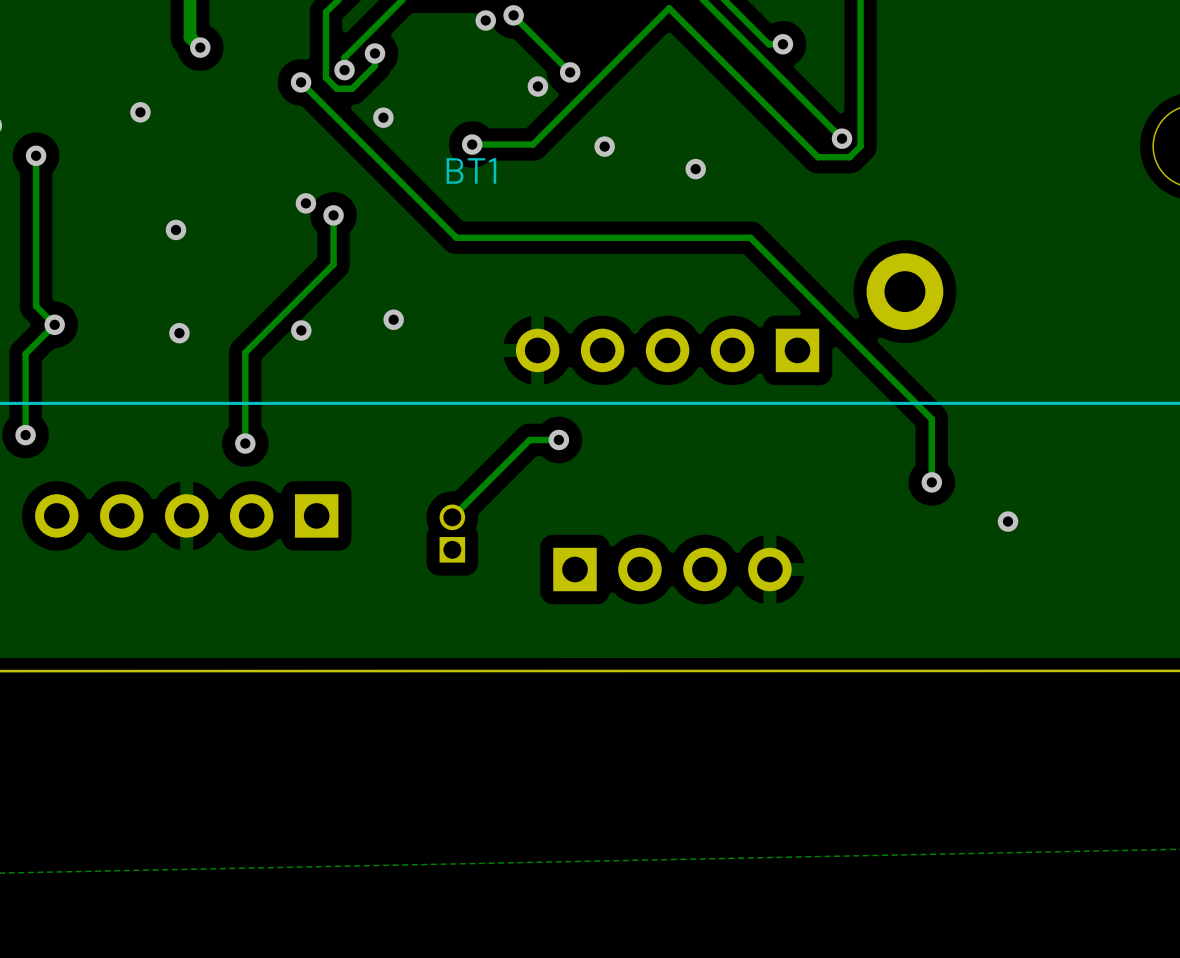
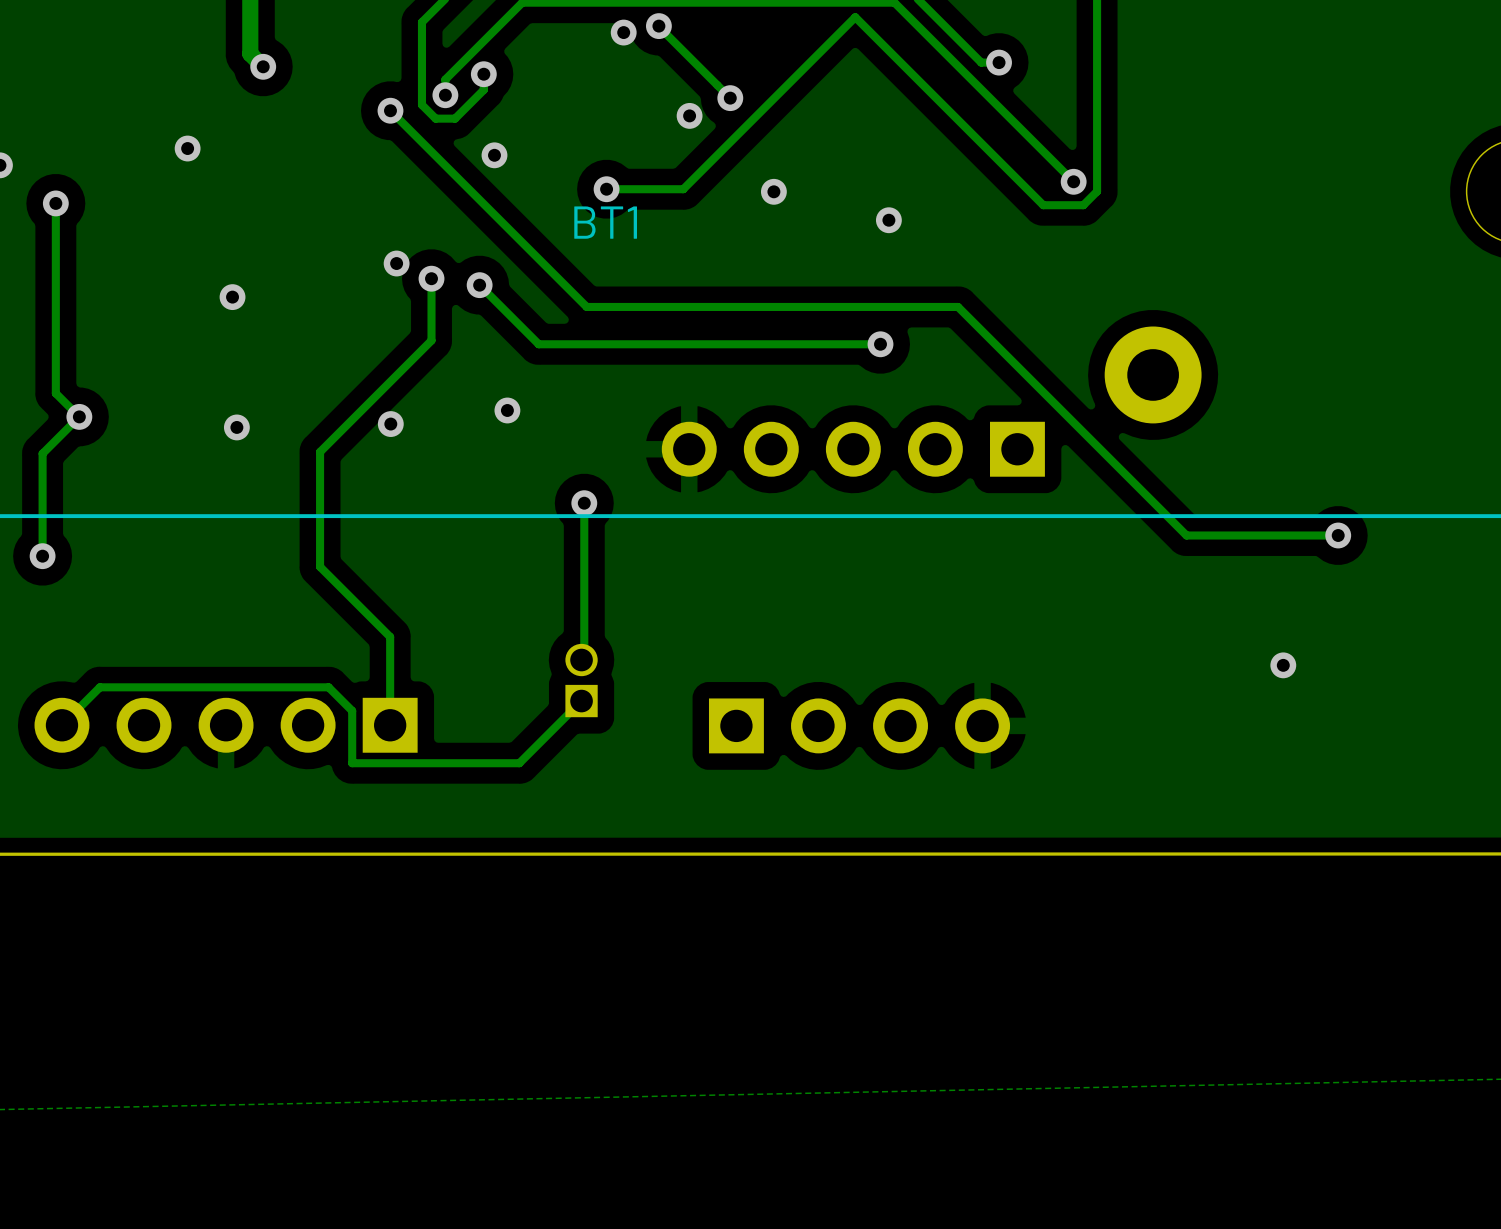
track: none -> (479, 285) (538, 344) (880, 344)
via: none -> (479, 285)
via: none -> (880, 344)
via: none -> (584, 503)
track: (931, 418) (931, 482) -> (1186, 535) (1338, 535)
track: (558, 439) (529, 439) (454, 515) -> (584, 503) (584, 657)
via: (558, 439) -> none
track: none -> (320, 566) (390, 636) (390, 725)
via: (245, 443) -> none
via position: (931, 482) -> (1338, 535)
part position: (186, 515) -> (226, 725)
track: none -> (581, 701) (519, 763) (352, 763) (352, 710) (328, 687) (99, 687) (61, 725)

